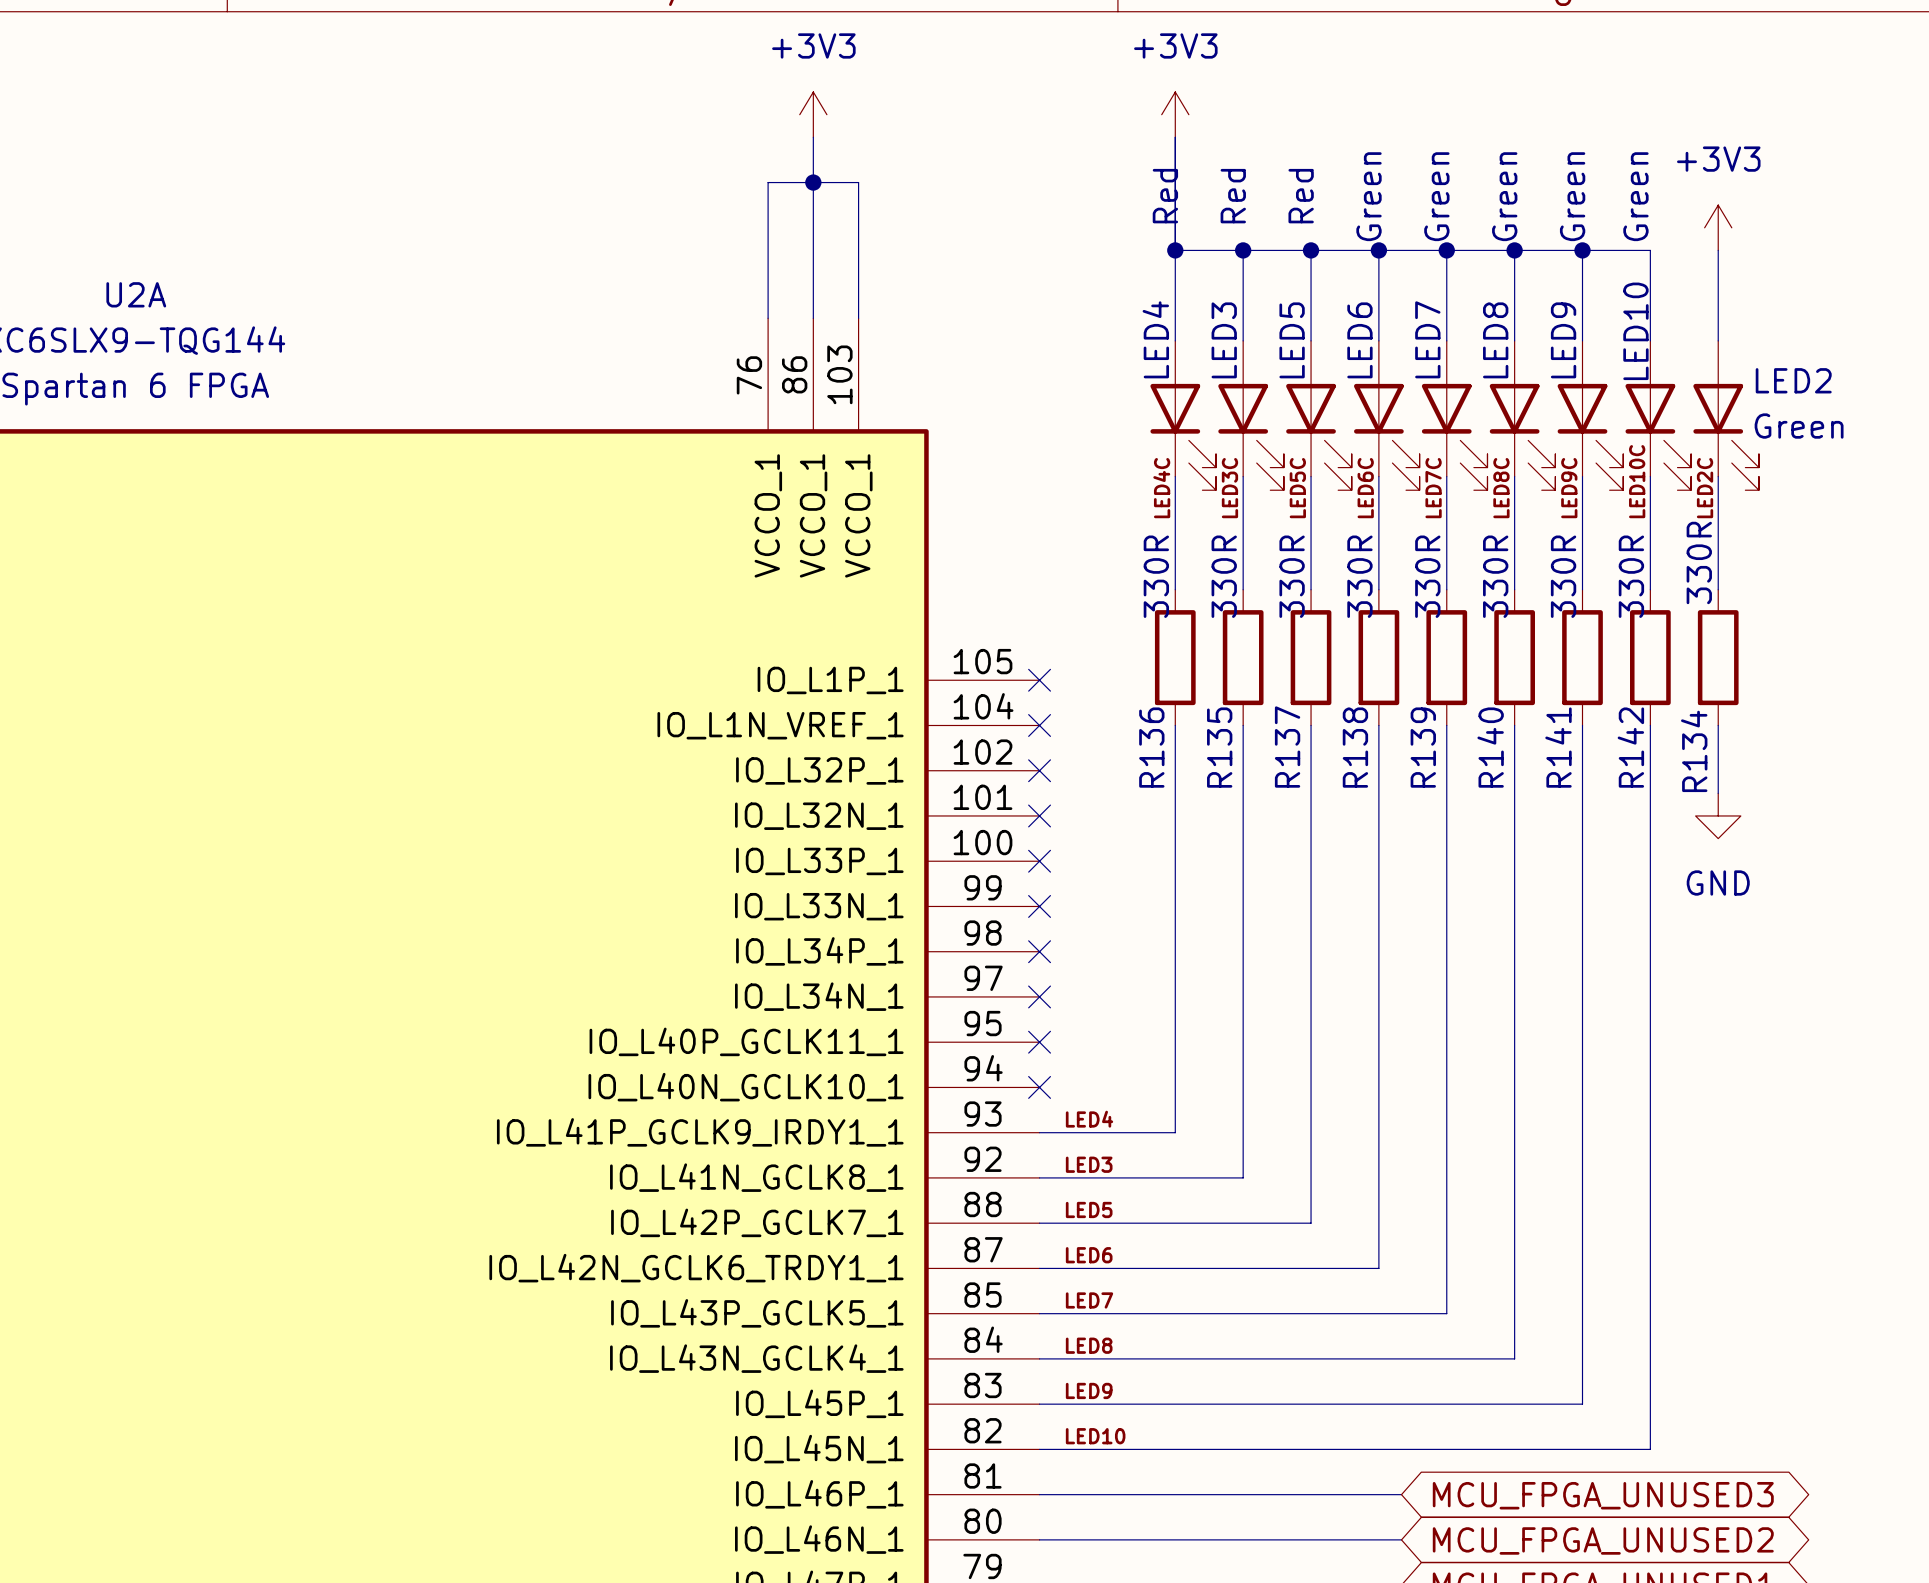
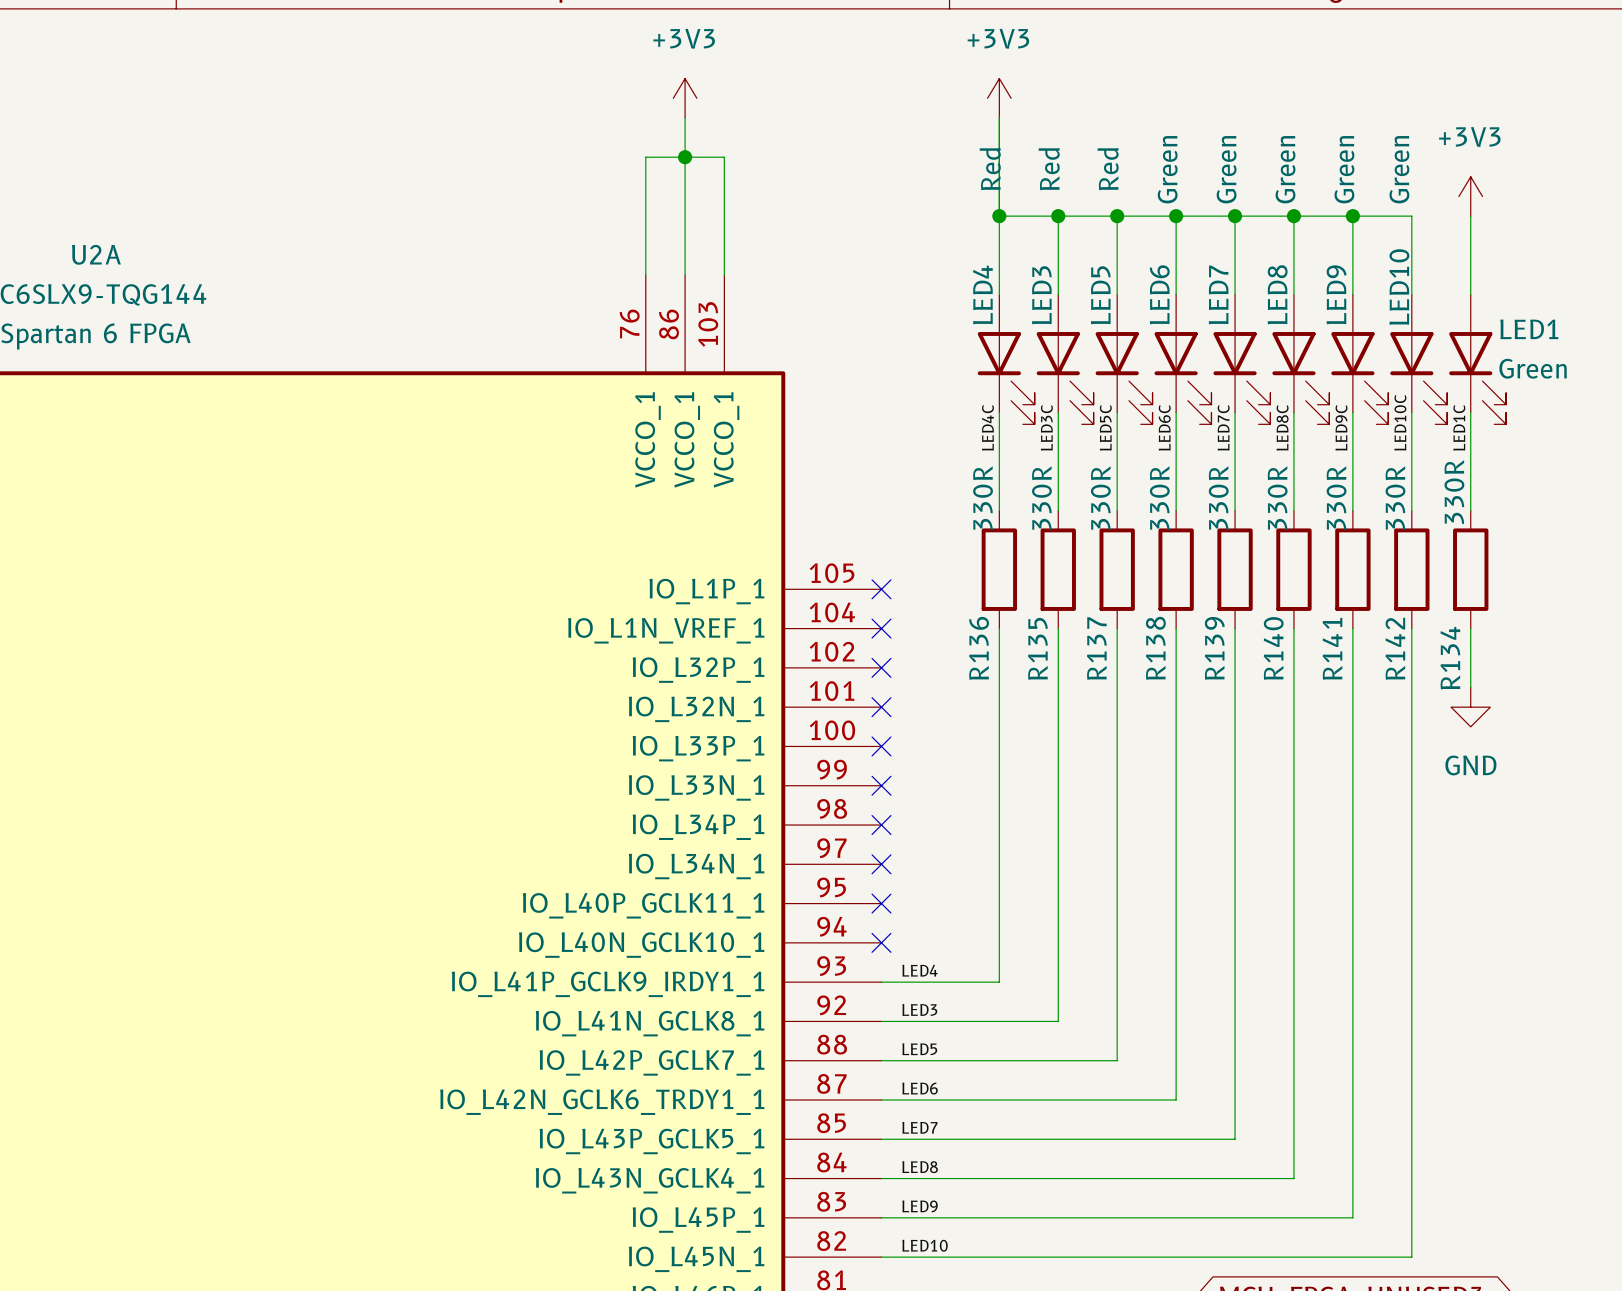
LED2 name: LED2 (1793, 380) -> LED1 (1529, 329)
label: LED2C (1705, 488) -> LED1C (1459, 427)

